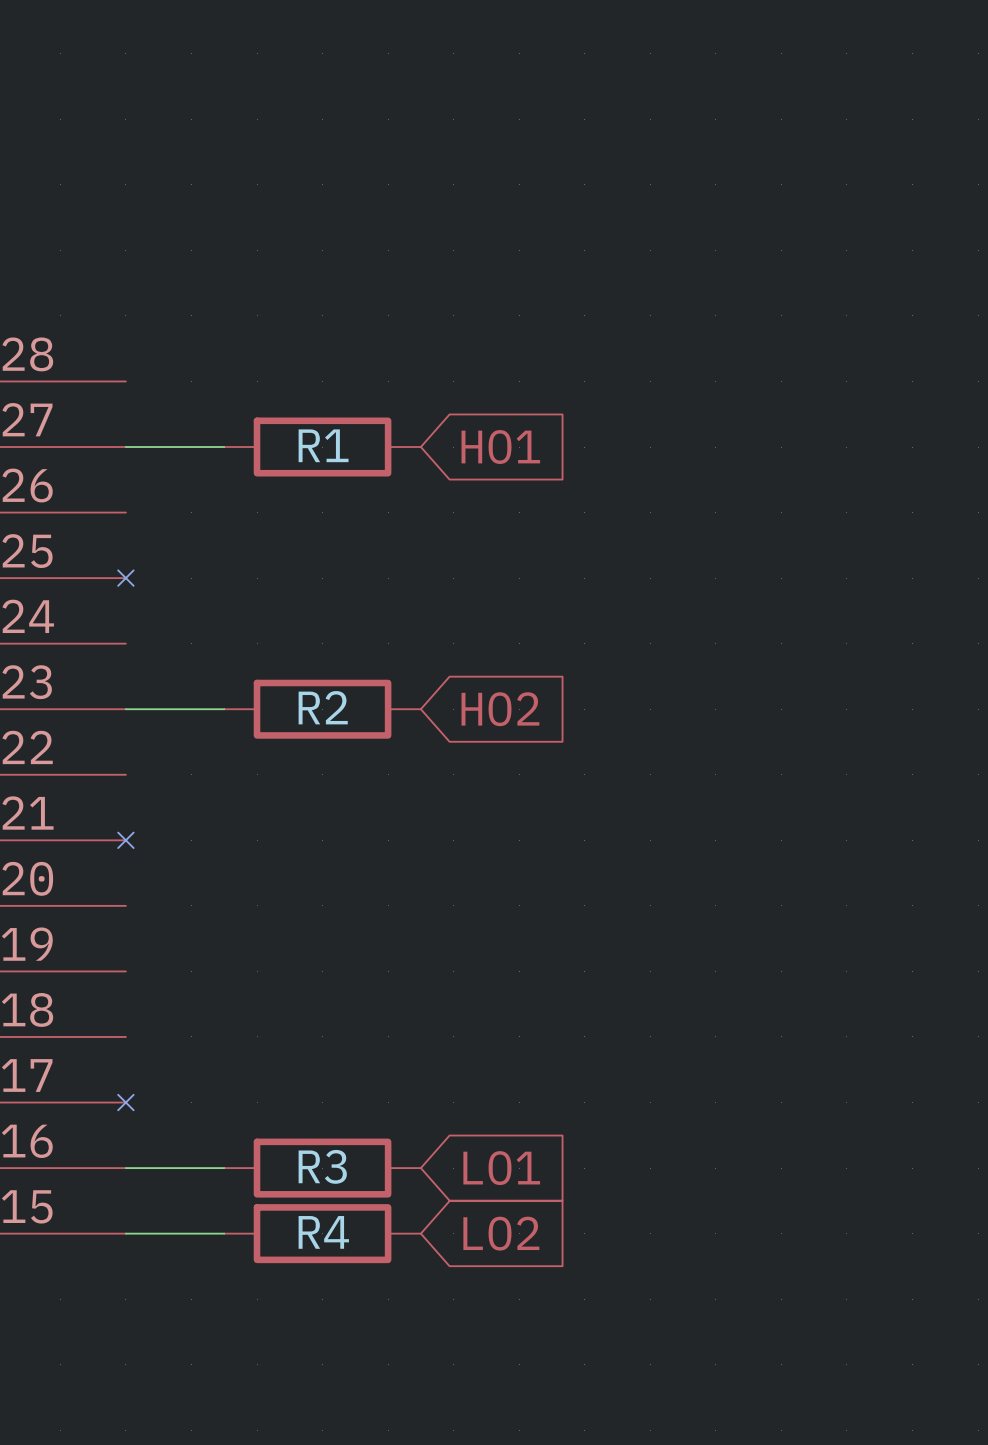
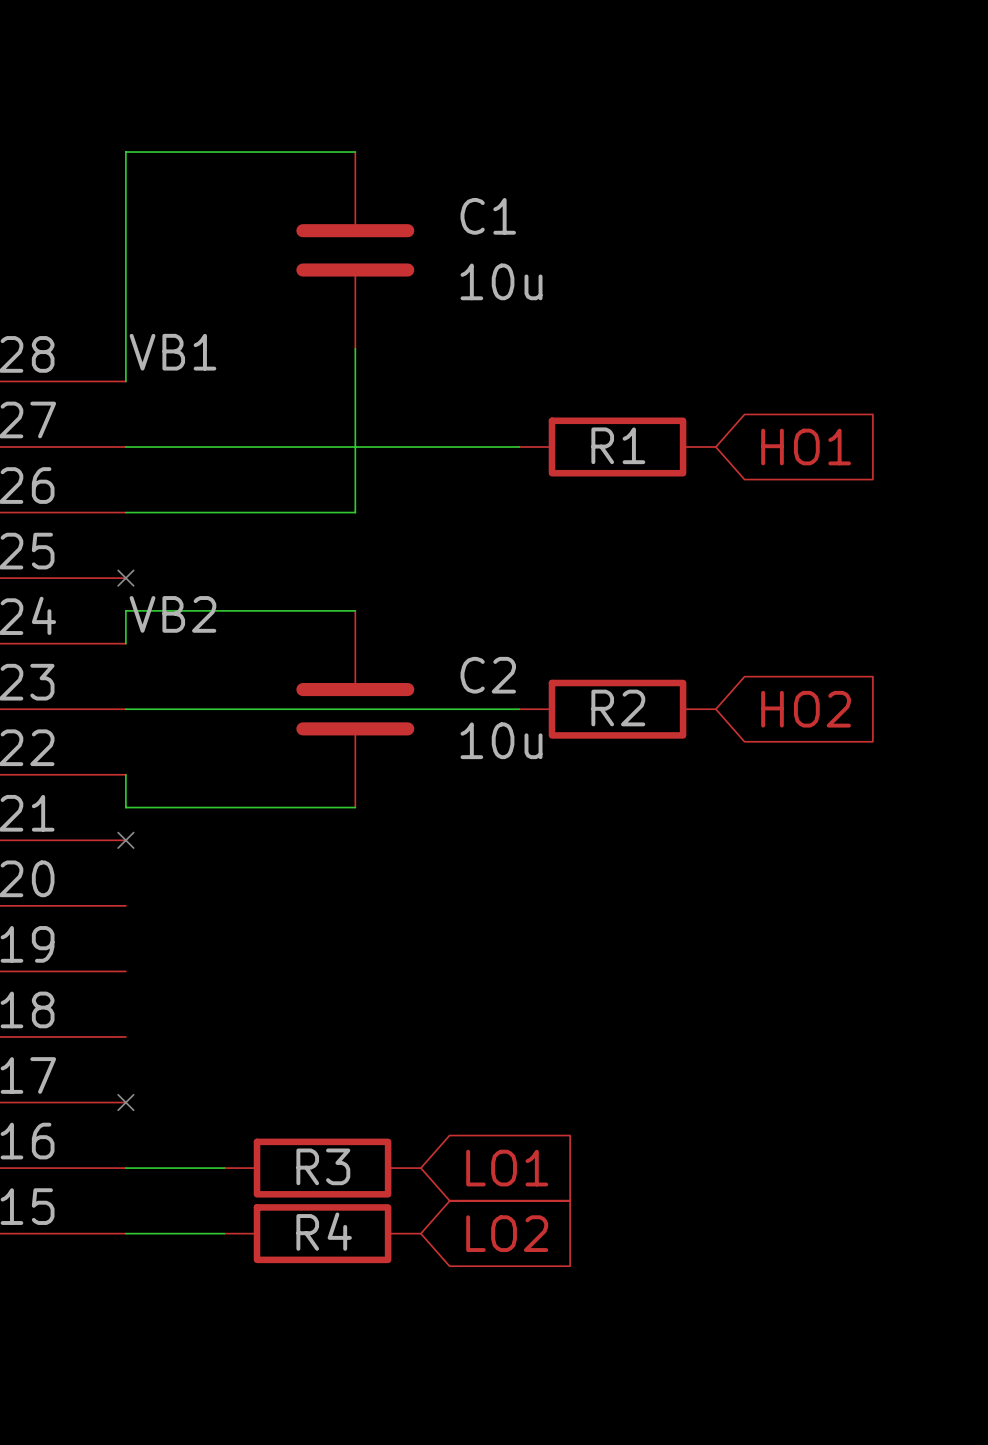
wire: none -> (355, 152) (125, 152) (125, 381)
C1: none -> 10u (355, 250)
wire: none -> (355, 348) (355, 512) (125, 512)
label: none -> VB1 (172, 352)
wire: none -> (224, 447) (519, 447)
R1 position: (322, 447) -> (617, 447)
global label position: HO1 (500, 447) -> HO1 (806, 447)
wire: none -> (355, 610) (125, 610) (125, 643)
label: none -> VB2 (172, 614)
wire: none -> (224, 709) (519, 709)
R2 position: (322, 709) -> (617, 709)
C2: none -> 10u (355, 709)
global label position: HO2 (500, 709) -> HO2 (806, 709)
wire: none -> (125, 774) (125, 807) (355, 807)

